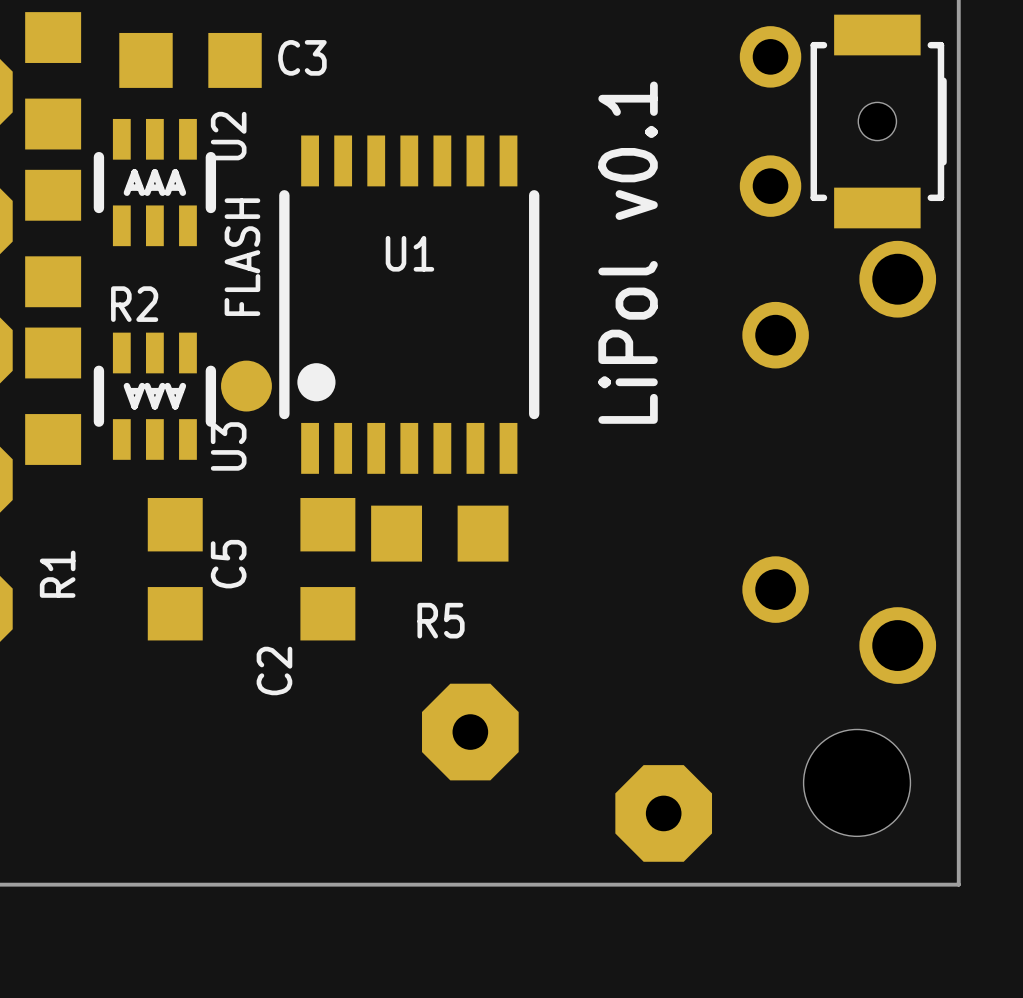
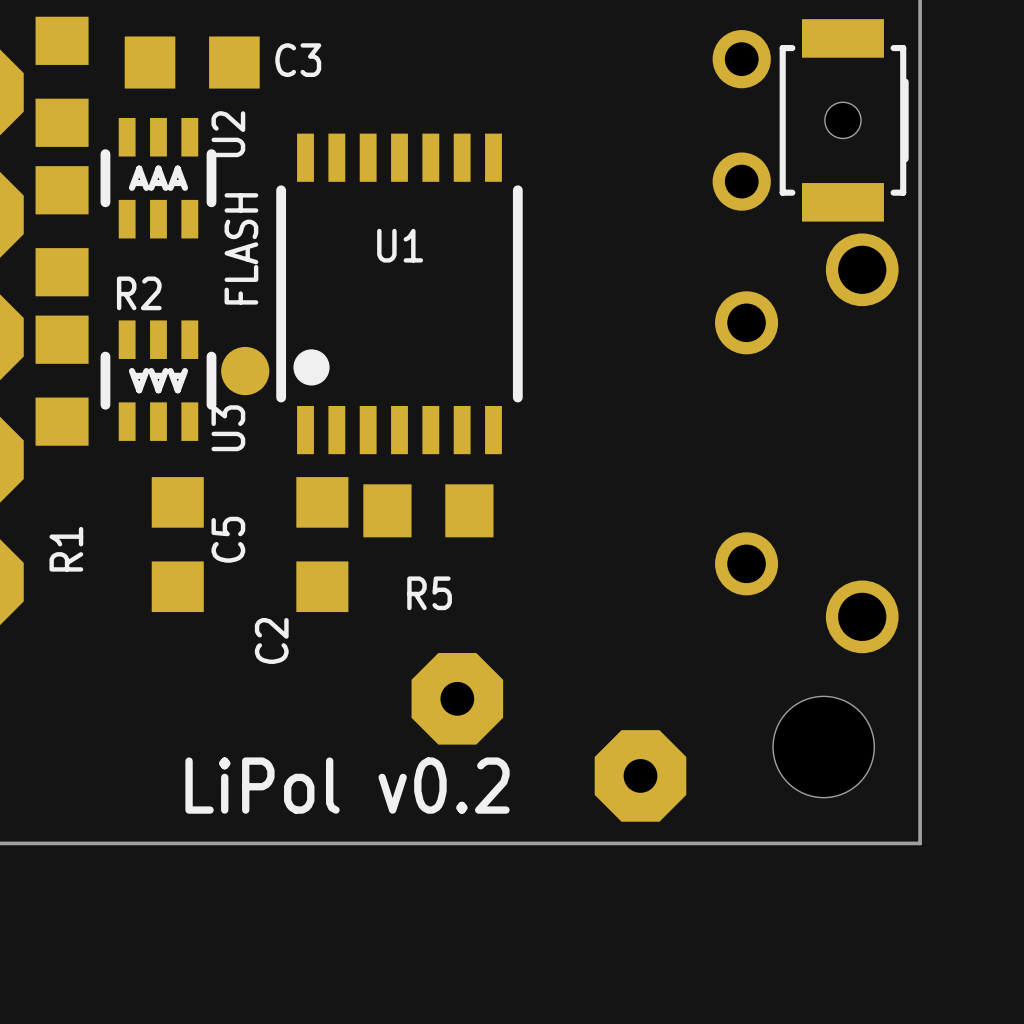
text: LiPol v0.1 (628, 252) -> none
text: none -> LiPol v0.2 (347, 785)

